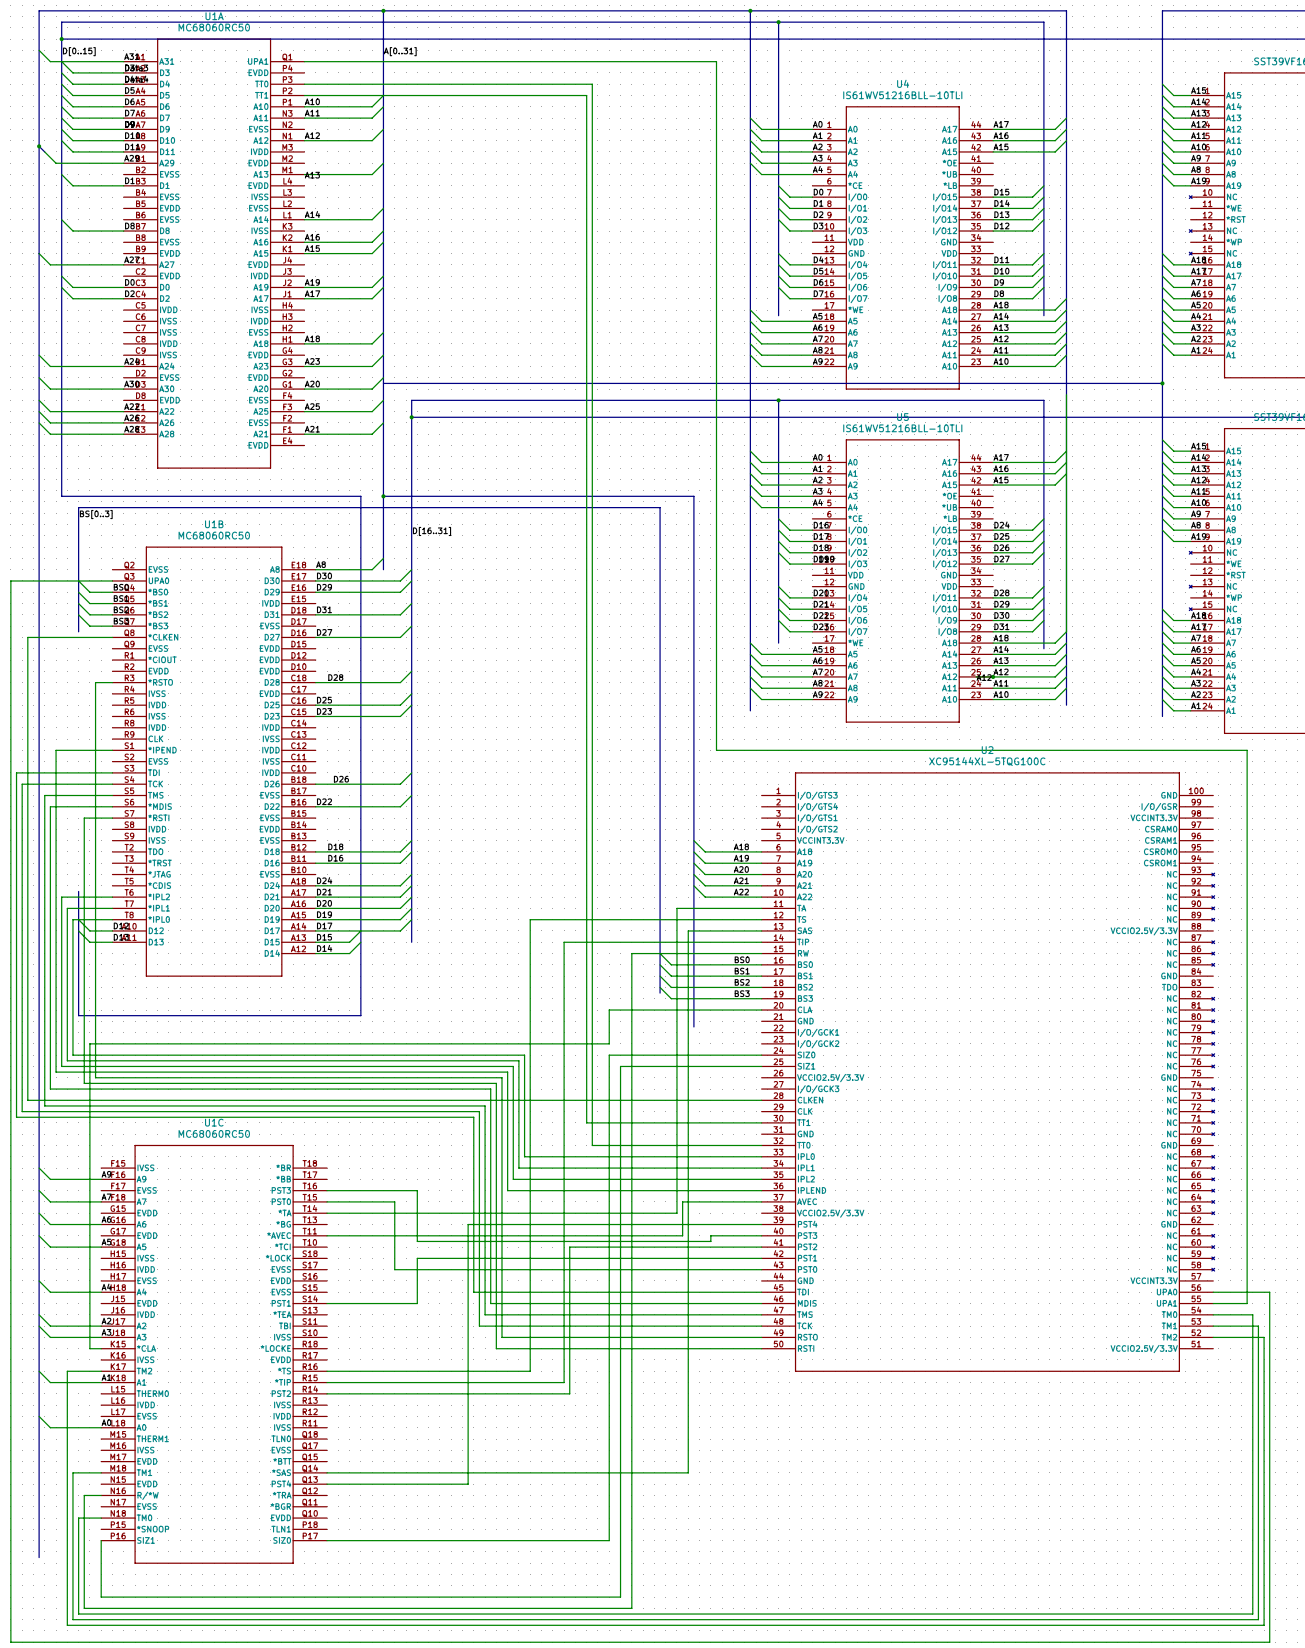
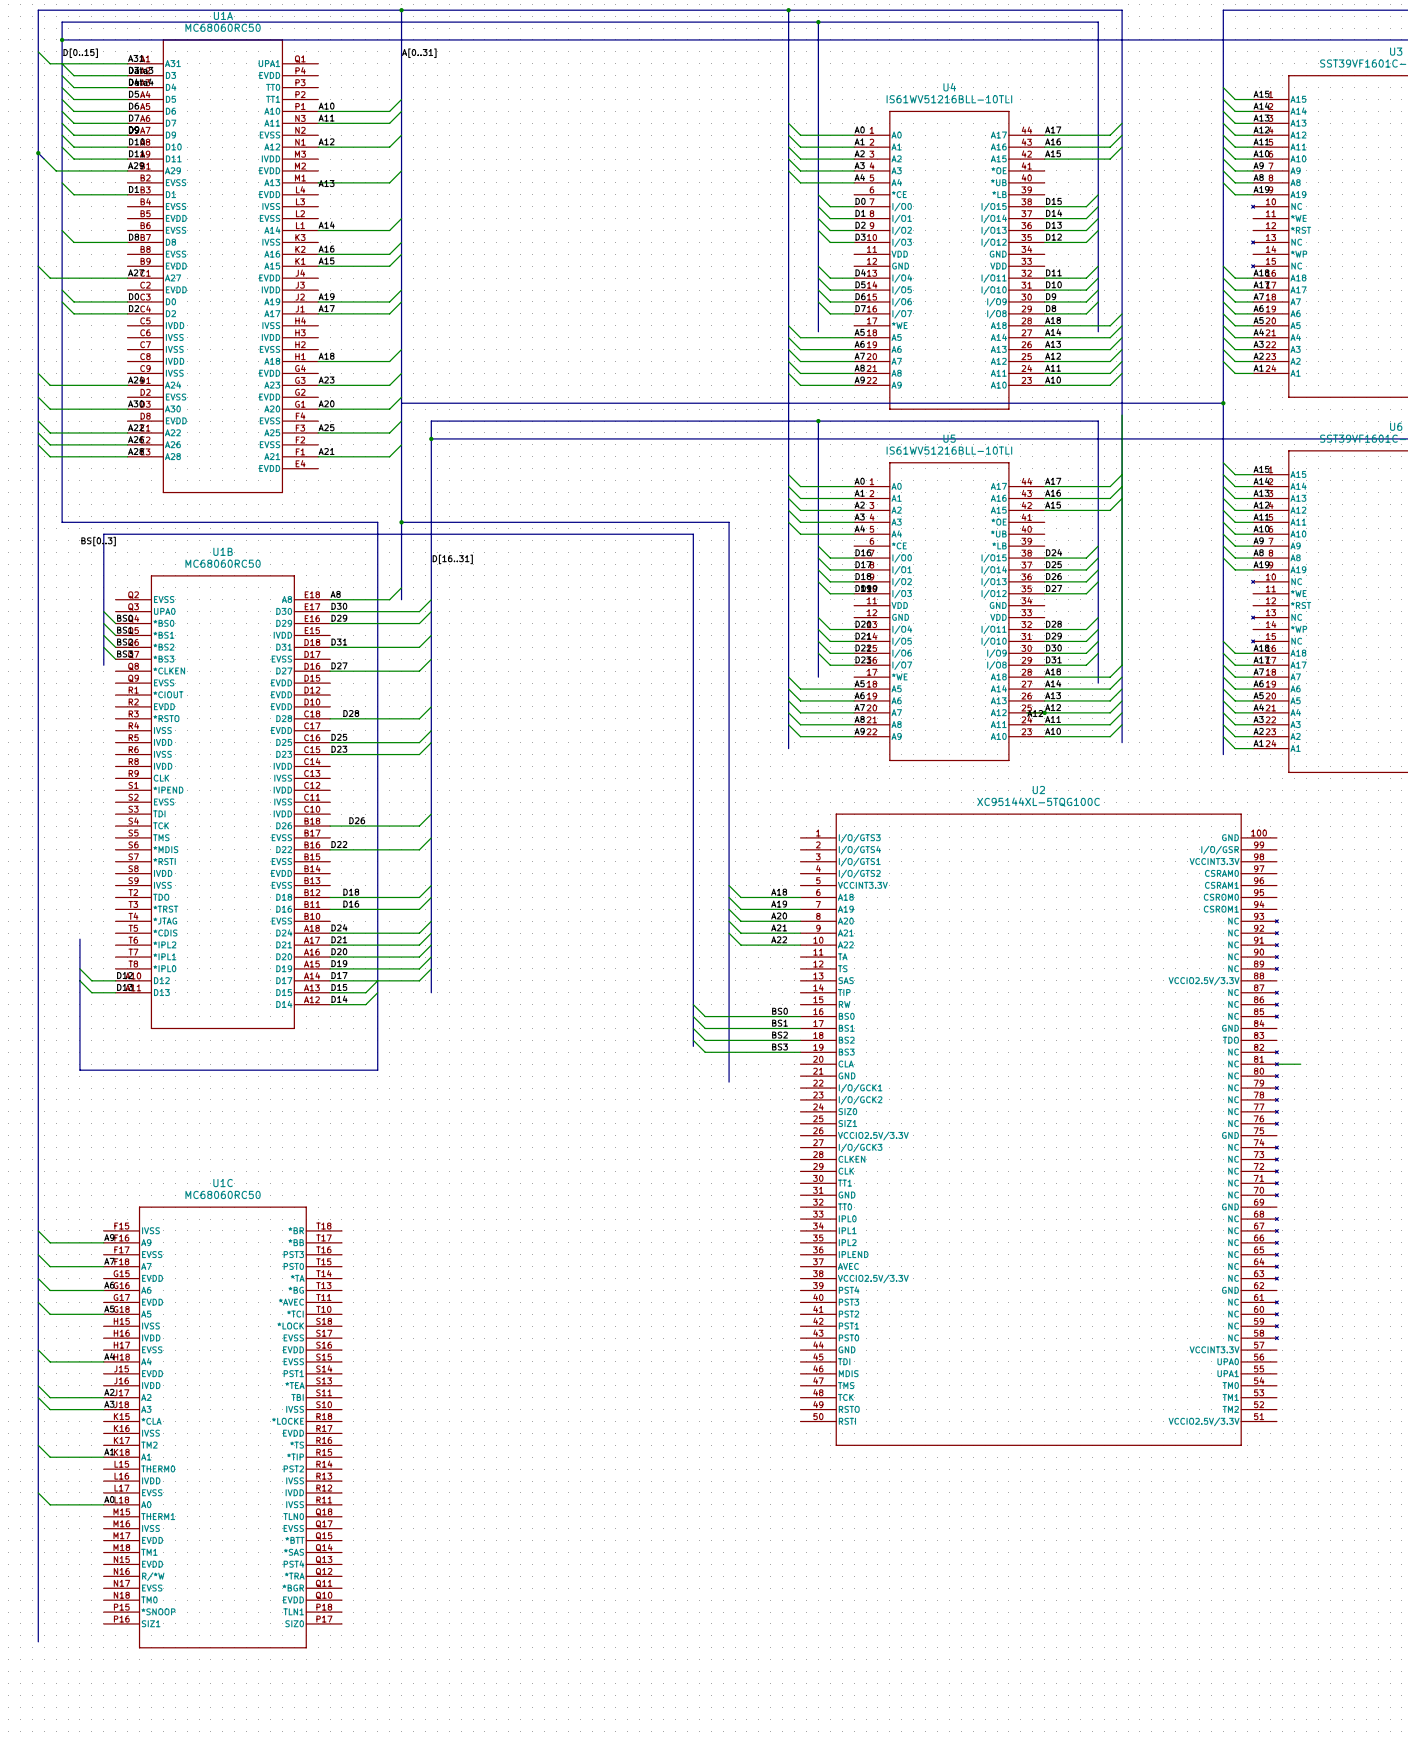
wire: (304, 61) (716, 61) (716, 750) (1247, 750) (1247, 1303) (1213, 1303) -> none
wire: (304, 84) (592, 84) (592, 1145) (761, 1145) -> none
wire: (304, 95) (586, 95) (586, 1122) (761, 1122) -> none
bus: (101, 507) (78, 507) (78, 631) -> (103, 534) (103, 665)
wire: (78, 580) (89, 592) (112, 592) -> (103, 611) (115, 623)
wire: (112, 580) (10, 580) (10, 1642) (1269, 1642) (1269, 1292) (1213, 1292) -> none
wire: (78, 592) (89, 603) (112, 603) -> (103, 623) (115, 635)
wire: (78, 603) (89, 614) (112, 614) -> (103, 635) (115, 647)
wire: (78, 614) (89, 626) (112, 626) -> (103, 647) (115, 659)
wire: (112, 637) (27, 637) (27, 1100) (761, 1100) -> none
wire: (112, 682) (95, 682) (95, 1077) (501, 1077) (501, 1337) (761, 1337) -> none
wire: (112, 750) (56, 750) (56, 1072) (507, 1072) (507, 1190) (761, 1190) -> none
wire: (112, 772) (16, 772) (16, 1117) (473, 1117) (473, 1292) (761, 1292) -> none
wire: (112, 784) (22, 784) (22, 1111) (479, 1111) (479, 1326) (761, 1326) -> none
wire: (112, 795) (44, 795) (44, 1105) (485, 1105) (485, 1314) (761, 1314) -> none
wire: (112, 806) (50, 806) (50, 1089) (490, 1089) (490, 1303) (761, 1303) -> none
wire: (112, 818) (84, 818) (84, 1083) (496, 1083) (496, 1348) (761, 1348) -> none
wire: (112, 897) (61, 897) (61, 1066) (513, 1066) (513, 1179) (761, 1179) -> none
wire: (112, 908) (67, 908) (67, 1060) (518, 1060) (518, 1168) (761, 1168) -> none
wire: (761, 908) (676, 908) (676, 1213) (327, 1213) -> none
wire: (112, 919) (72, 919) (72, 1055) (524, 1055) (524, 1156) (761, 1156) -> none
wire: (761, 919) (530, 919) (530, 1371) (327, 1371) -> none
wire: (761, 930) (688, 930) (688, 1472) (327, 1472) -> none
wire: (761, 942) (564, 942) (564, 1382) (327, 1382) -> none
wire: (761, 953) (631, 953) (631, 1608) (84, 1608) (84, 1495) (101, 1495) -> none
wire: (761, 1010) (609, 1010) (609, 1043) (89, 1043) (89, 1348) (101, 1348) -> none
wire: none -> (1276, 1064) (1300, 1064)
wire: (761, 1055) (609, 1055) (609, 1540) (327, 1540) -> none
wire: (761, 1066) (620, 1066) (620, 1597) (101, 1597) (101, 1540) -> none
wire: (327, 1190) (417, 1190) (417, 1241) (710, 1241) (710, 1235) (761, 1235) -> none
wire: (327, 1201) (394, 1201) (394, 1269) (761, 1269) -> none
wire: (761, 1201) (682, 1201) (682, 1235) (327, 1235) -> none
wire: (761, 1224) (468, 1224) (468, 1484) (327, 1484) -> none
wire: (761, 1247) (569, 1247) (569, 1393) (327, 1393) -> none
wire: (761, 1258) (417, 1258) (417, 1303) (327, 1303) -> none
wire: (1213, 1314) (1252, 1314) (1252, 1614) (78, 1614) (78, 1518) (101, 1518) -> none
wire: (1213, 1326) (1258, 1326) (1258, 1619) (72, 1619) (72, 1472) (101, 1472) -> none
wire: (1213, 1337) (1264, 1337) (1264, 1625) (67, 1625) (67, 1371) (101, 1371) -> none

